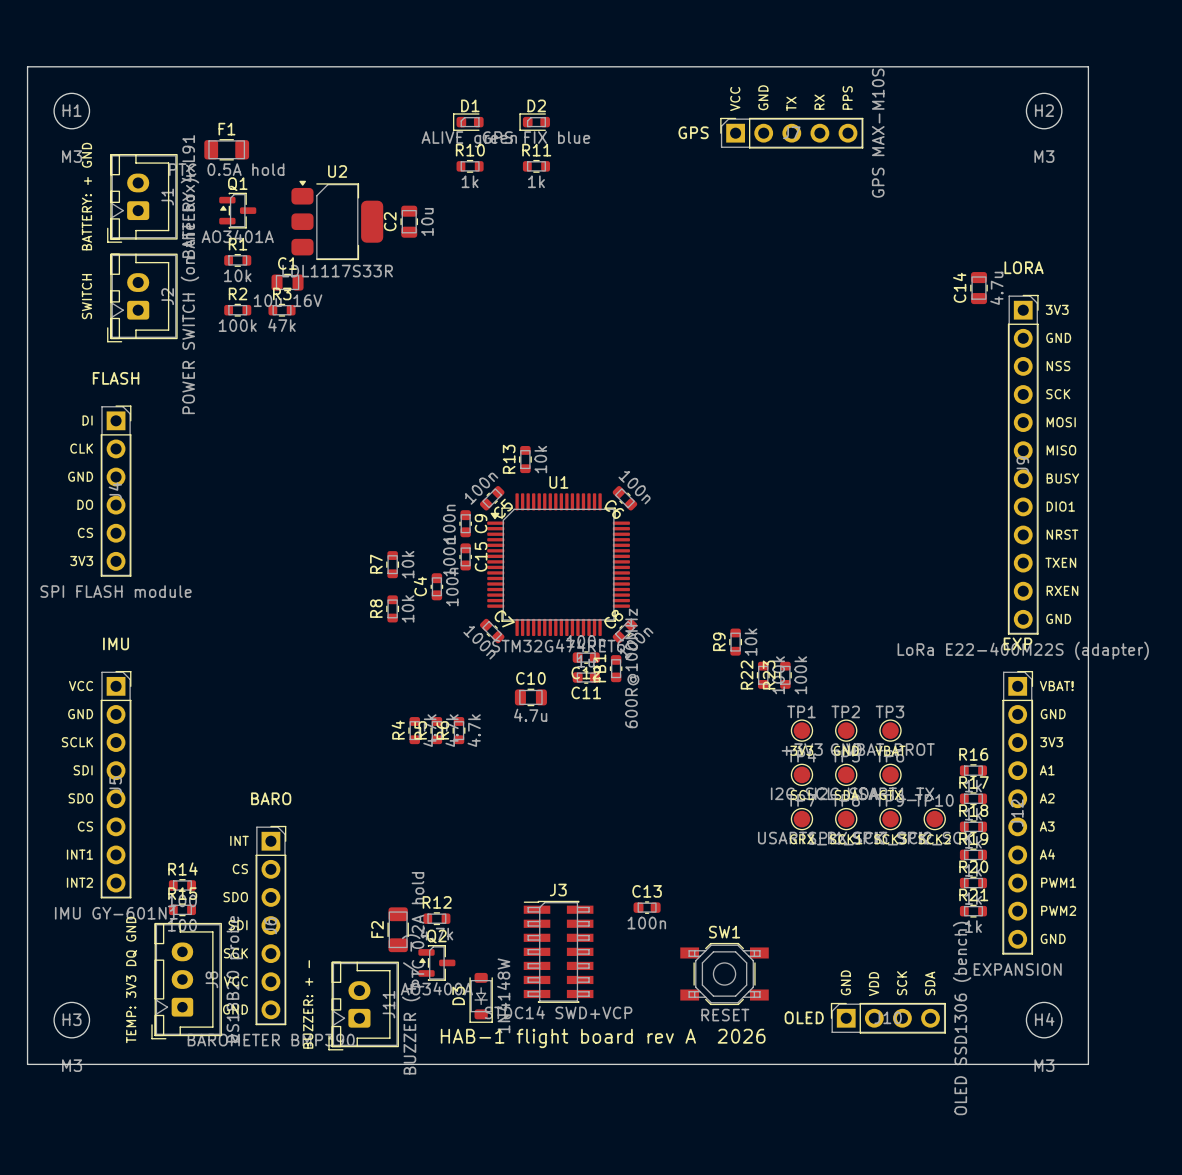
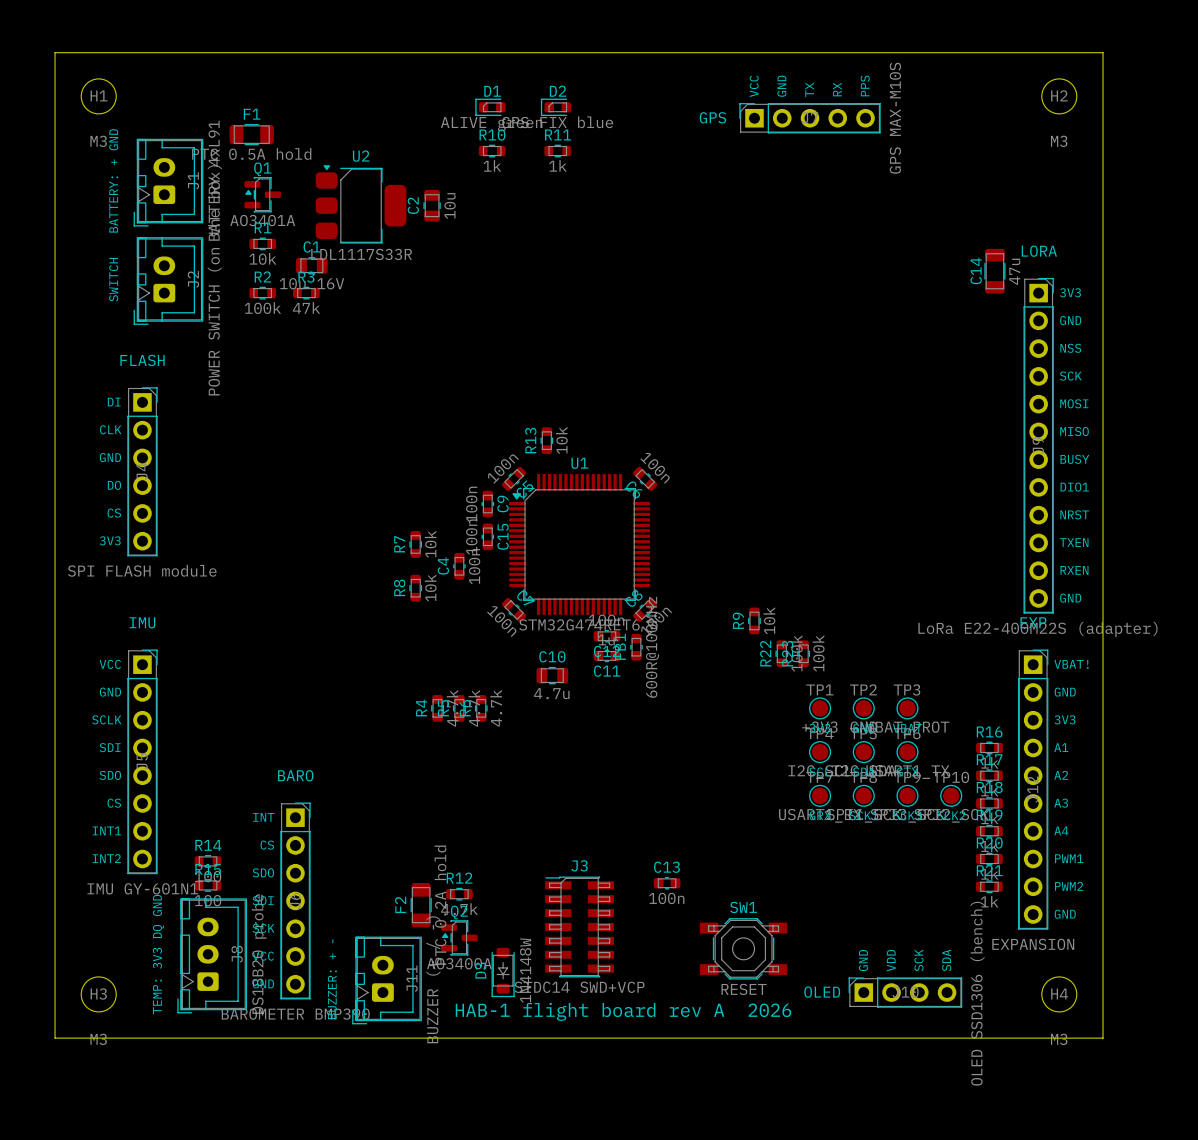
C14 footprint: [970, 272, 988, 305] -> [984, 248, 1006, 294]
C14 value: 4.7u (996, 288) -> 47u (1014, 271)

